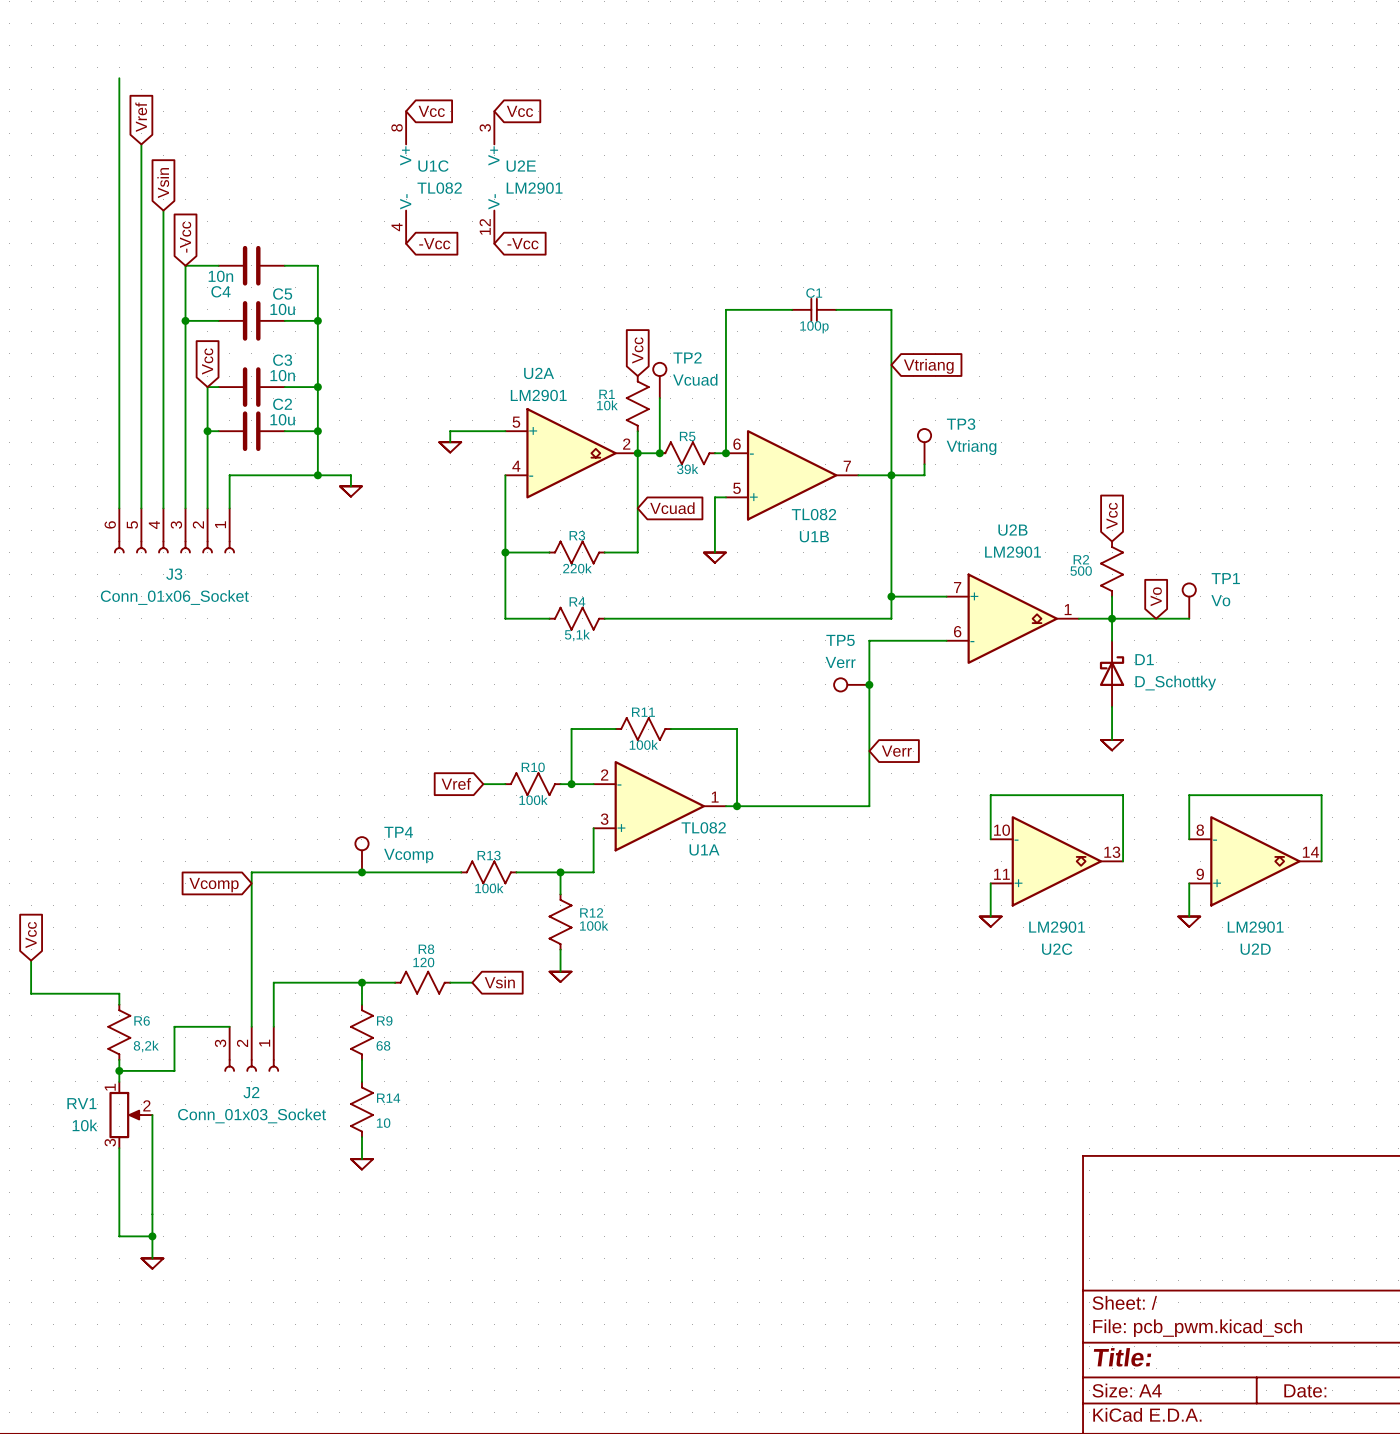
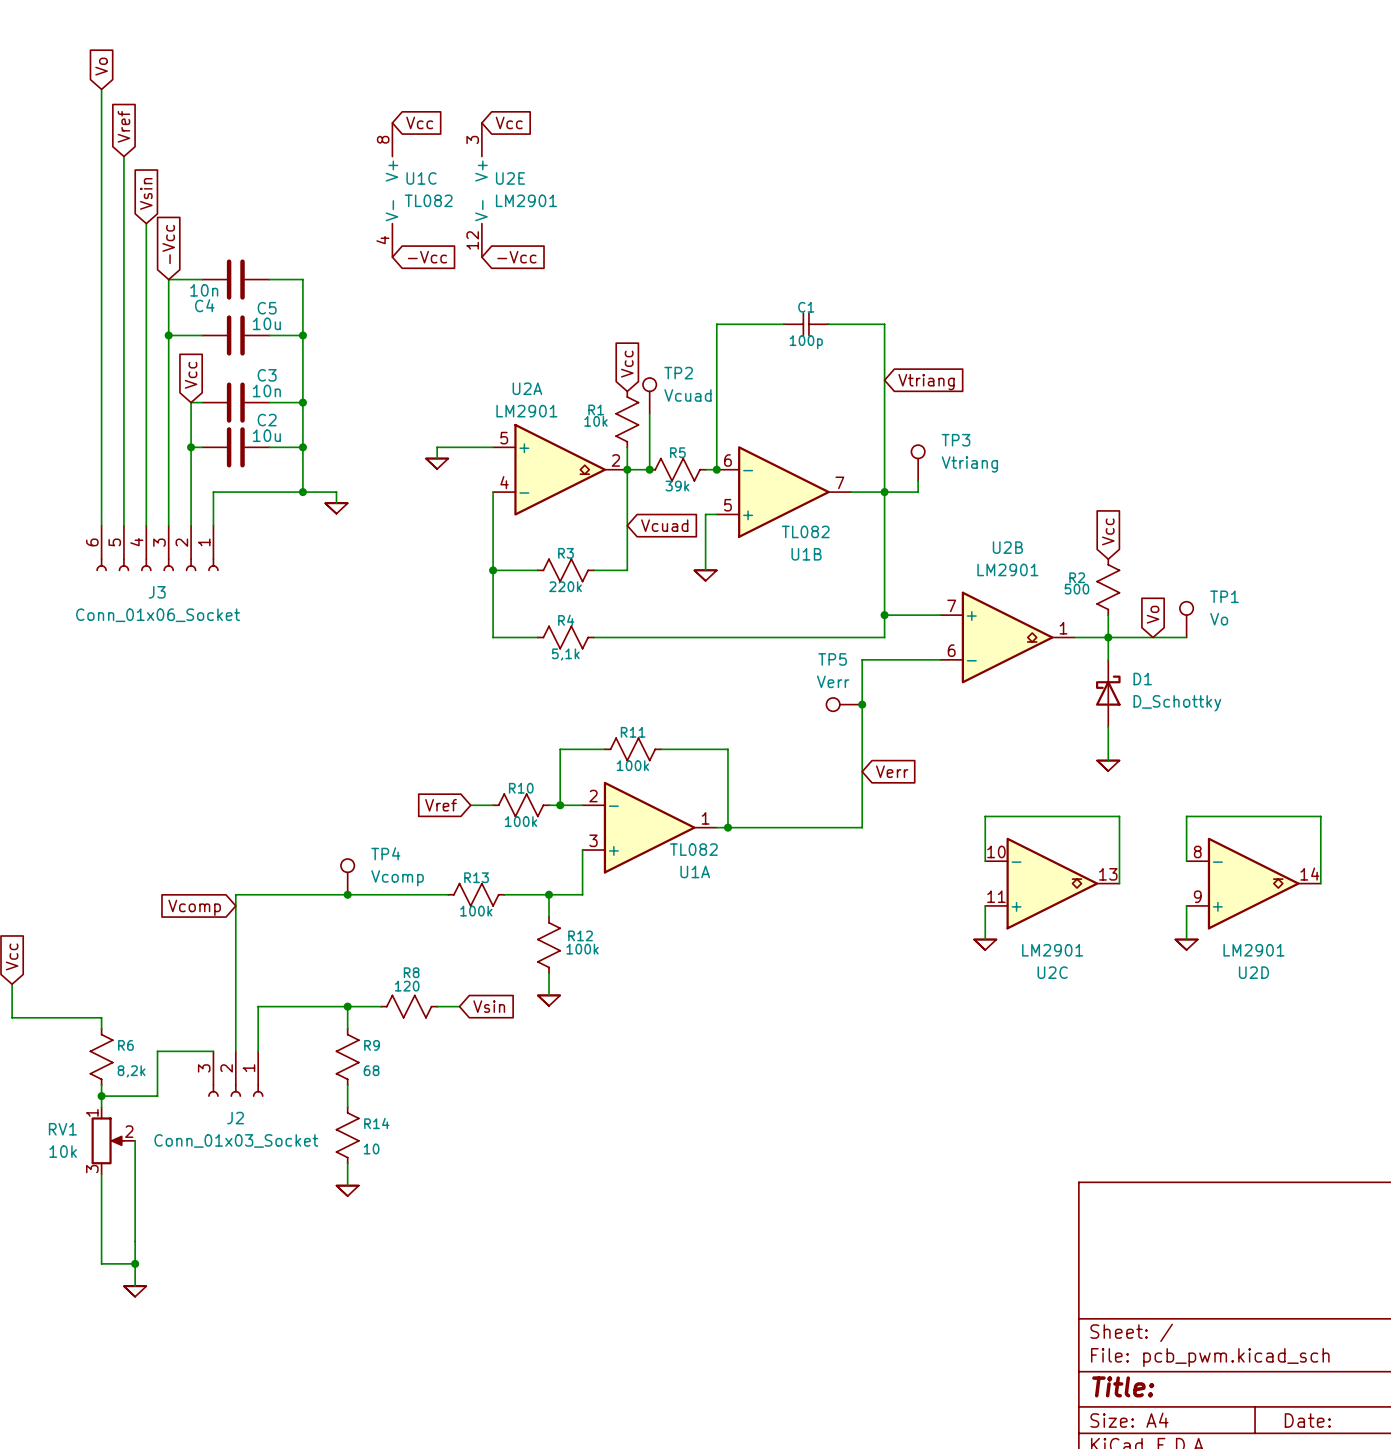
global label: none -> Vo (101, 66)

